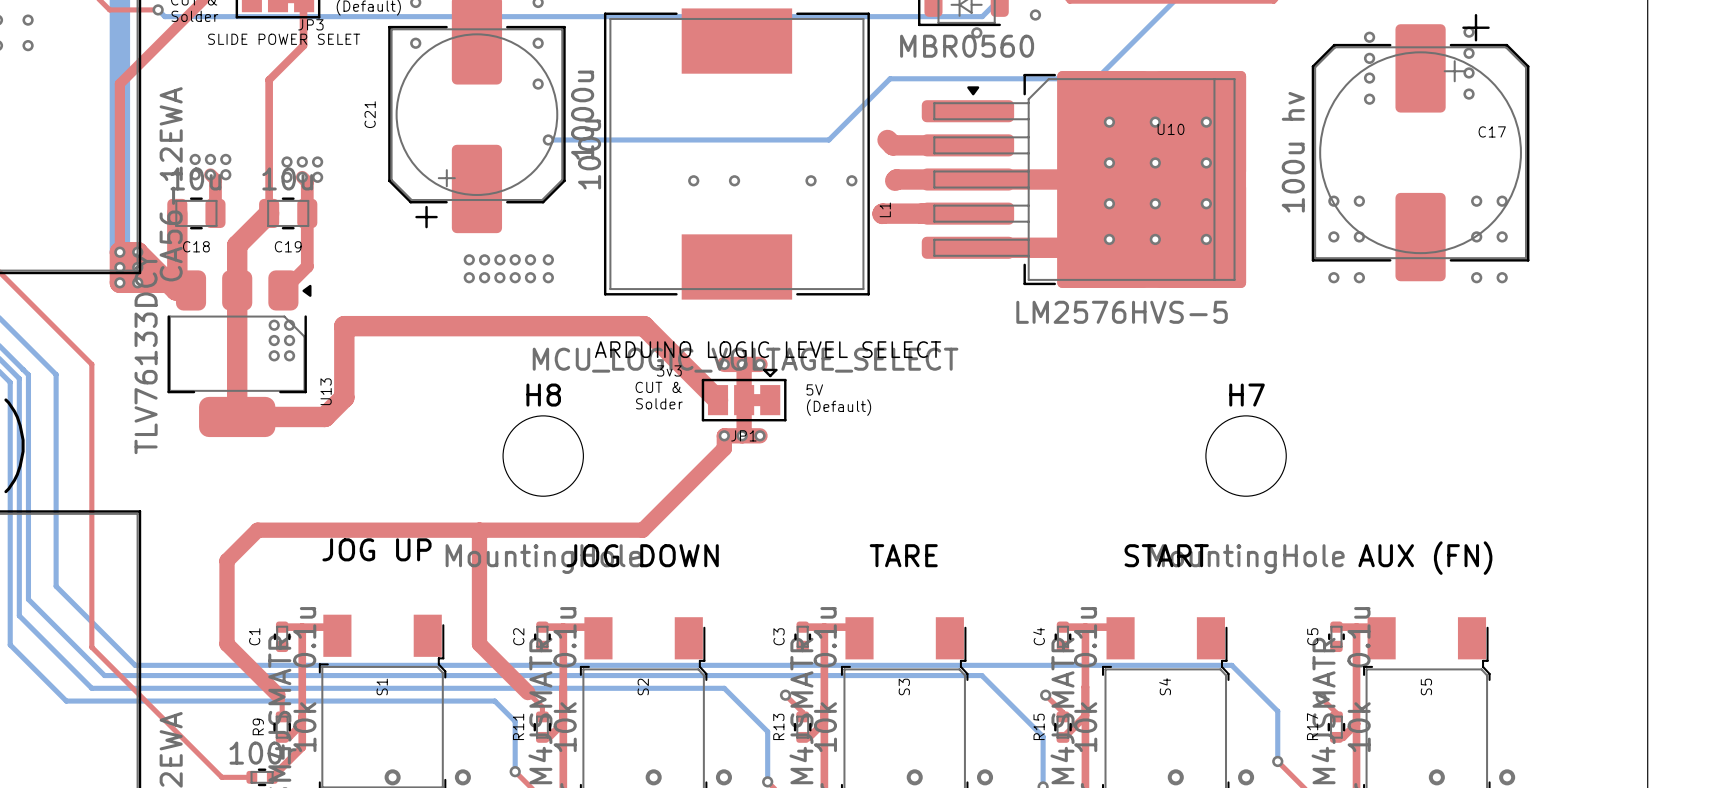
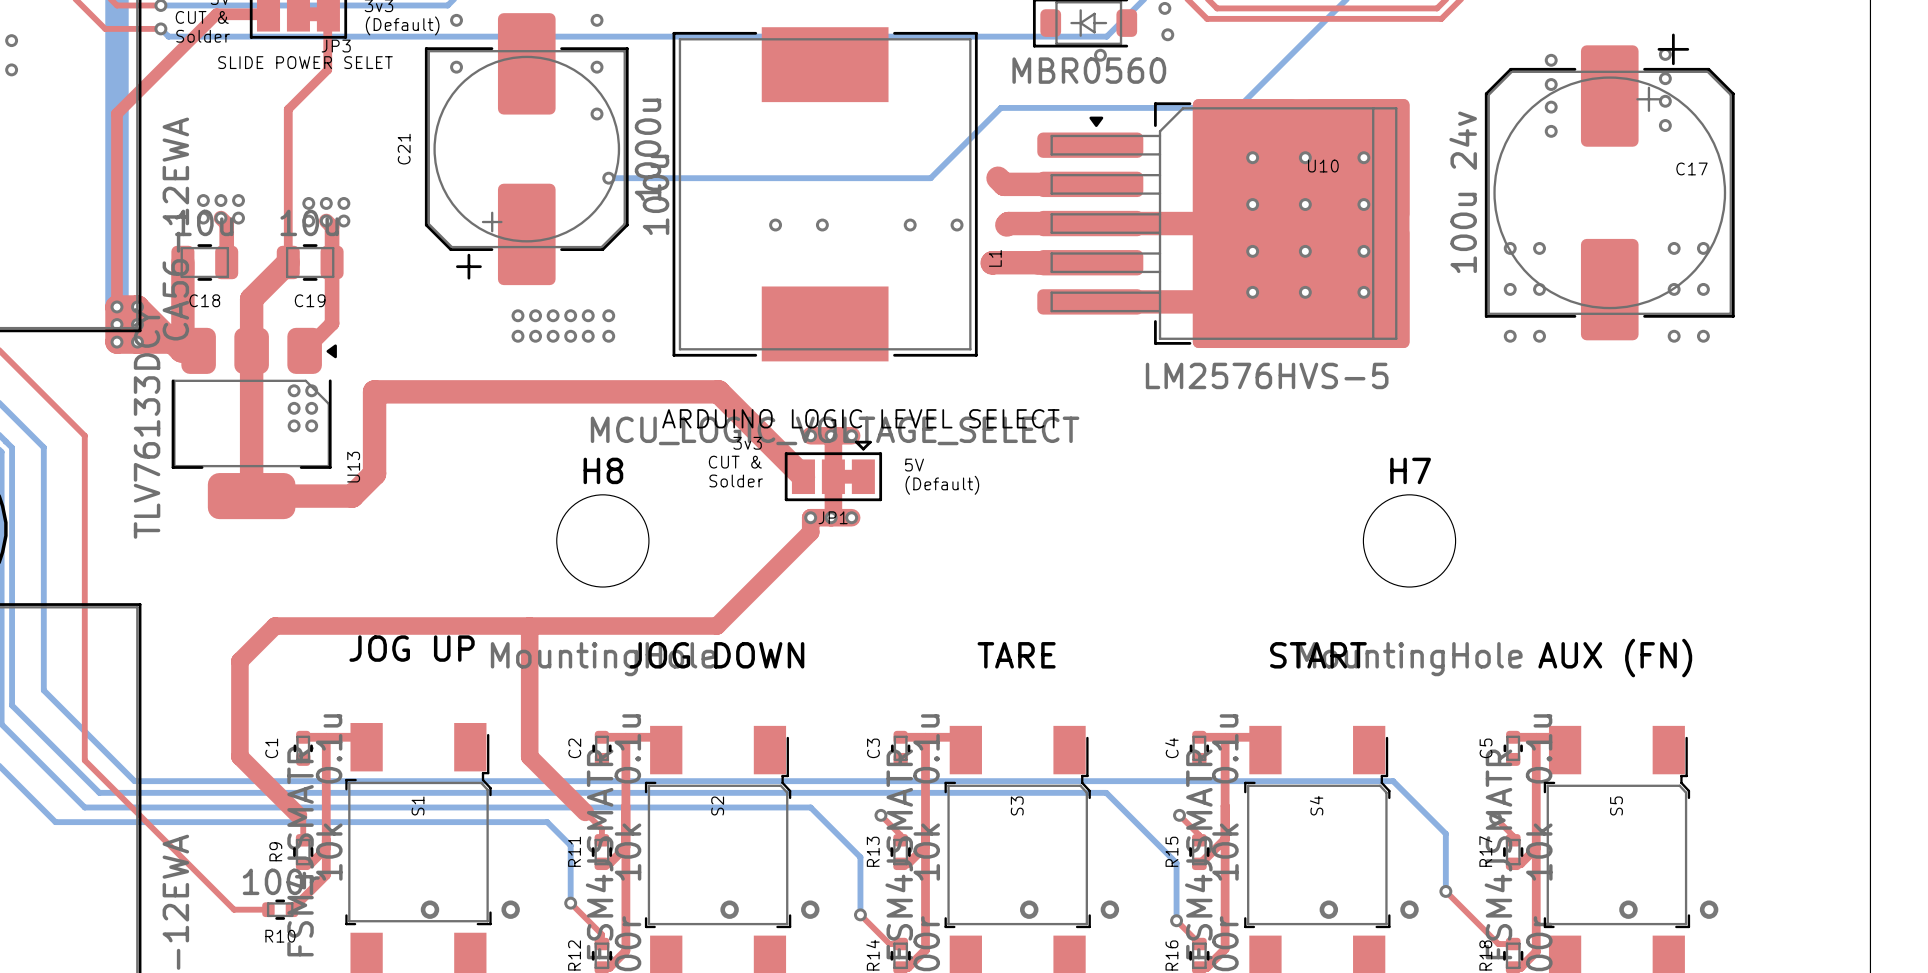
C17 value: 100u hv (1293, 152) -> 100u 24v (1463, 192)

